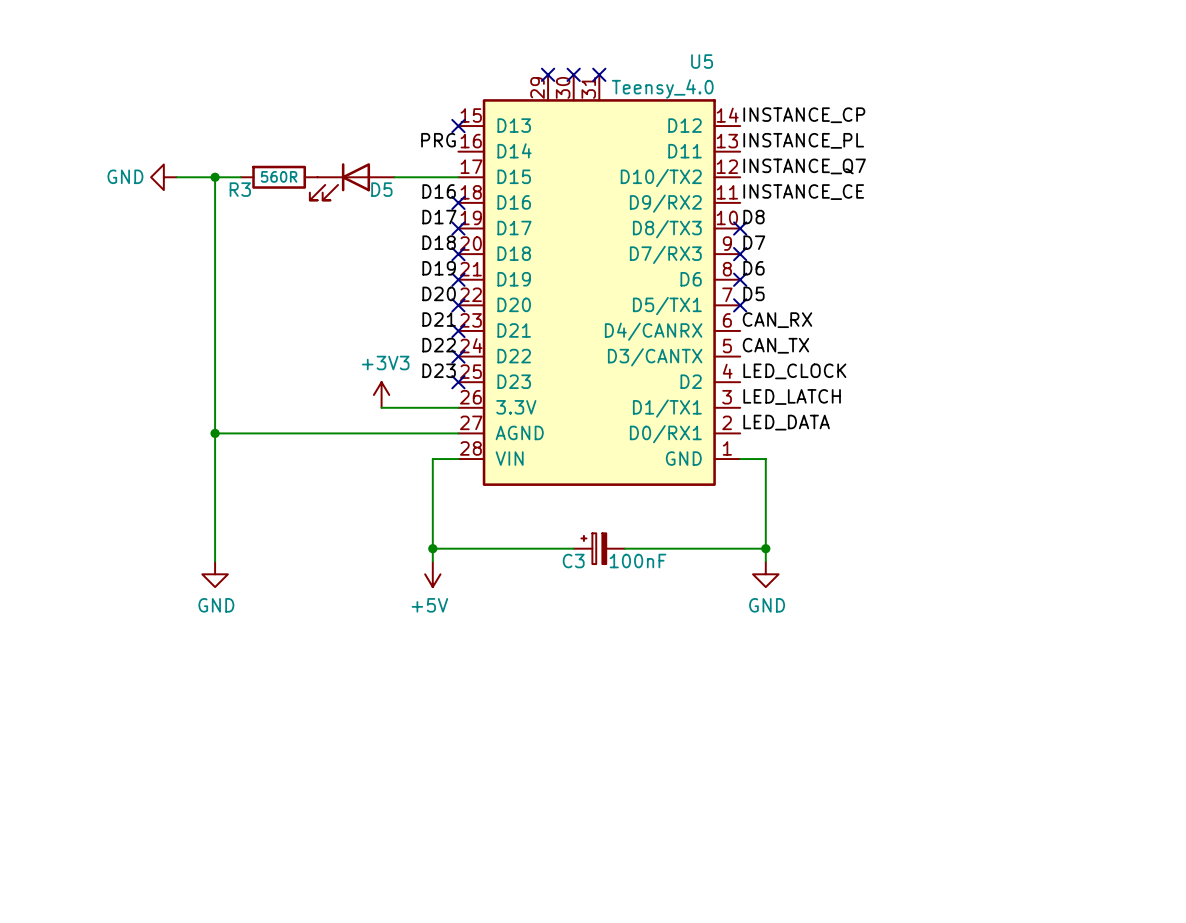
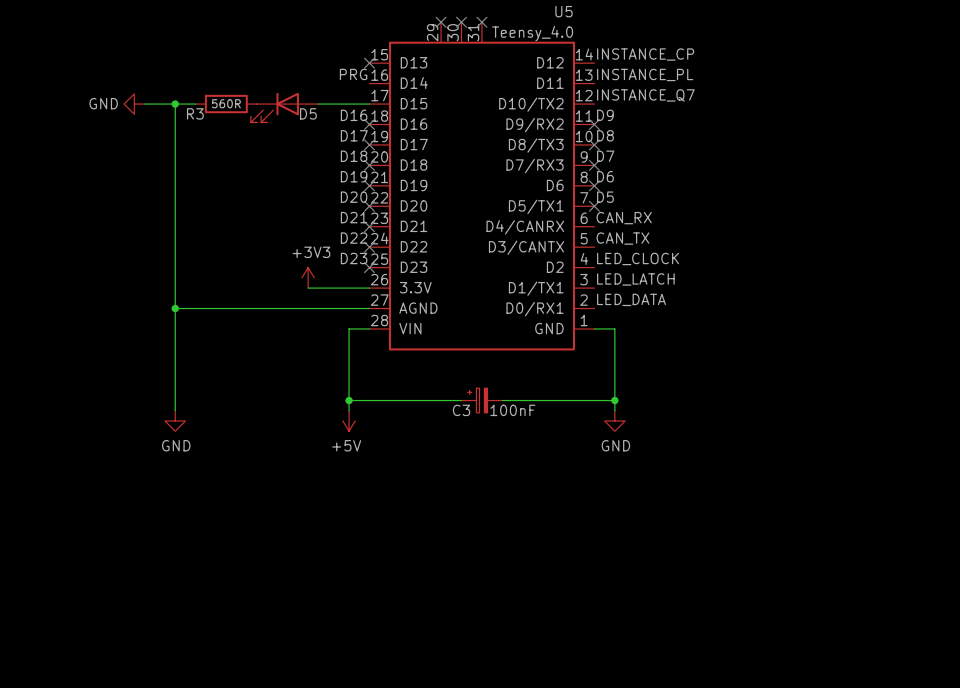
label: INSTANCE_CE (803, 192) -> D9 (605, 115)
no-connect mark: none -> (594, 124)

